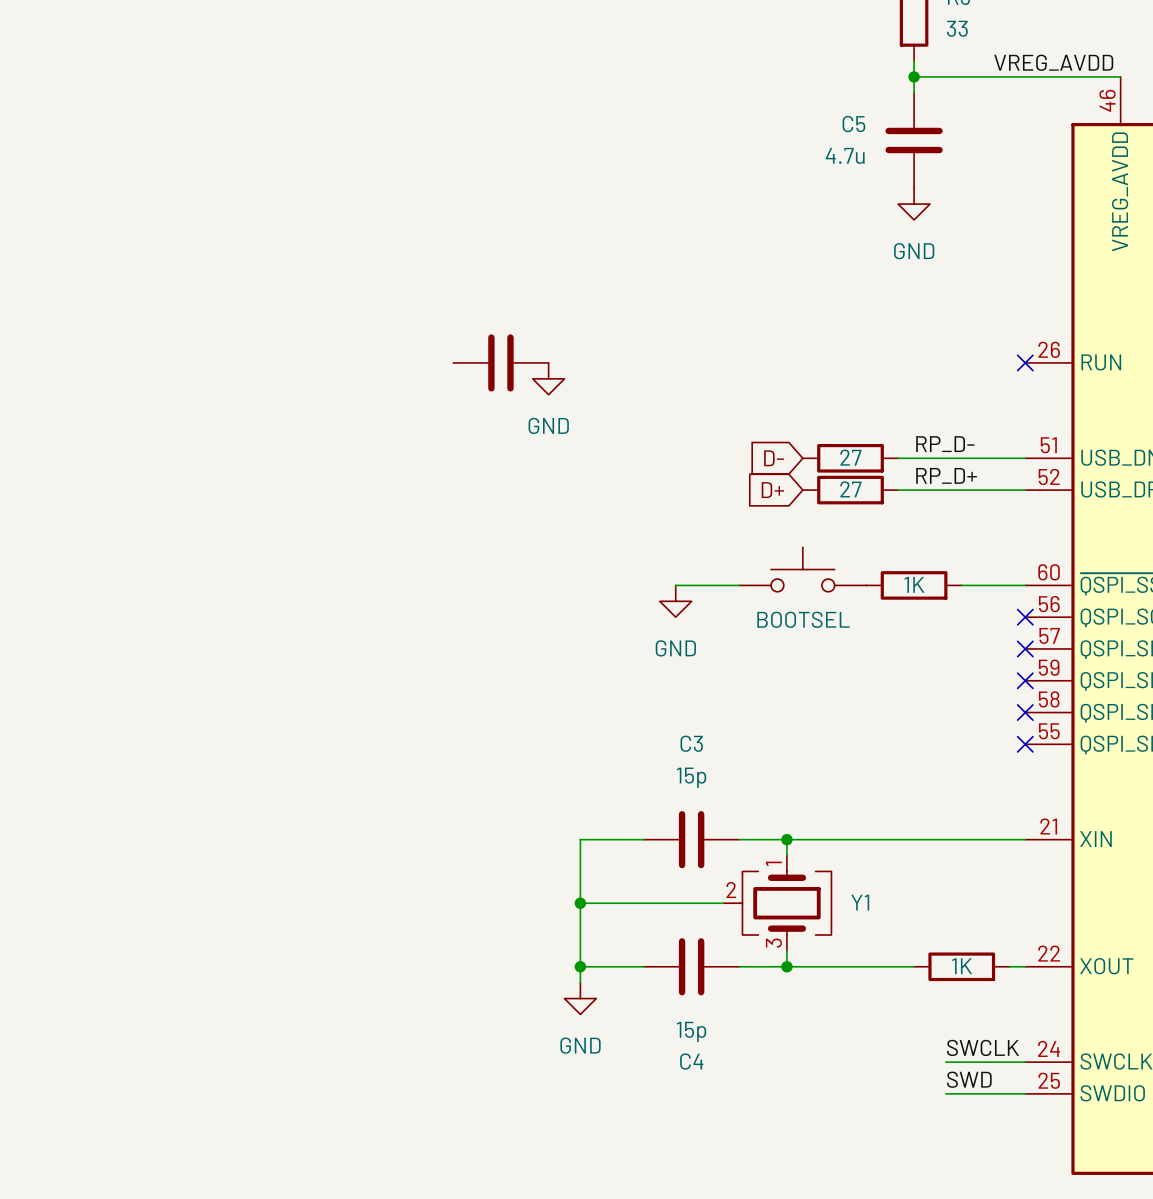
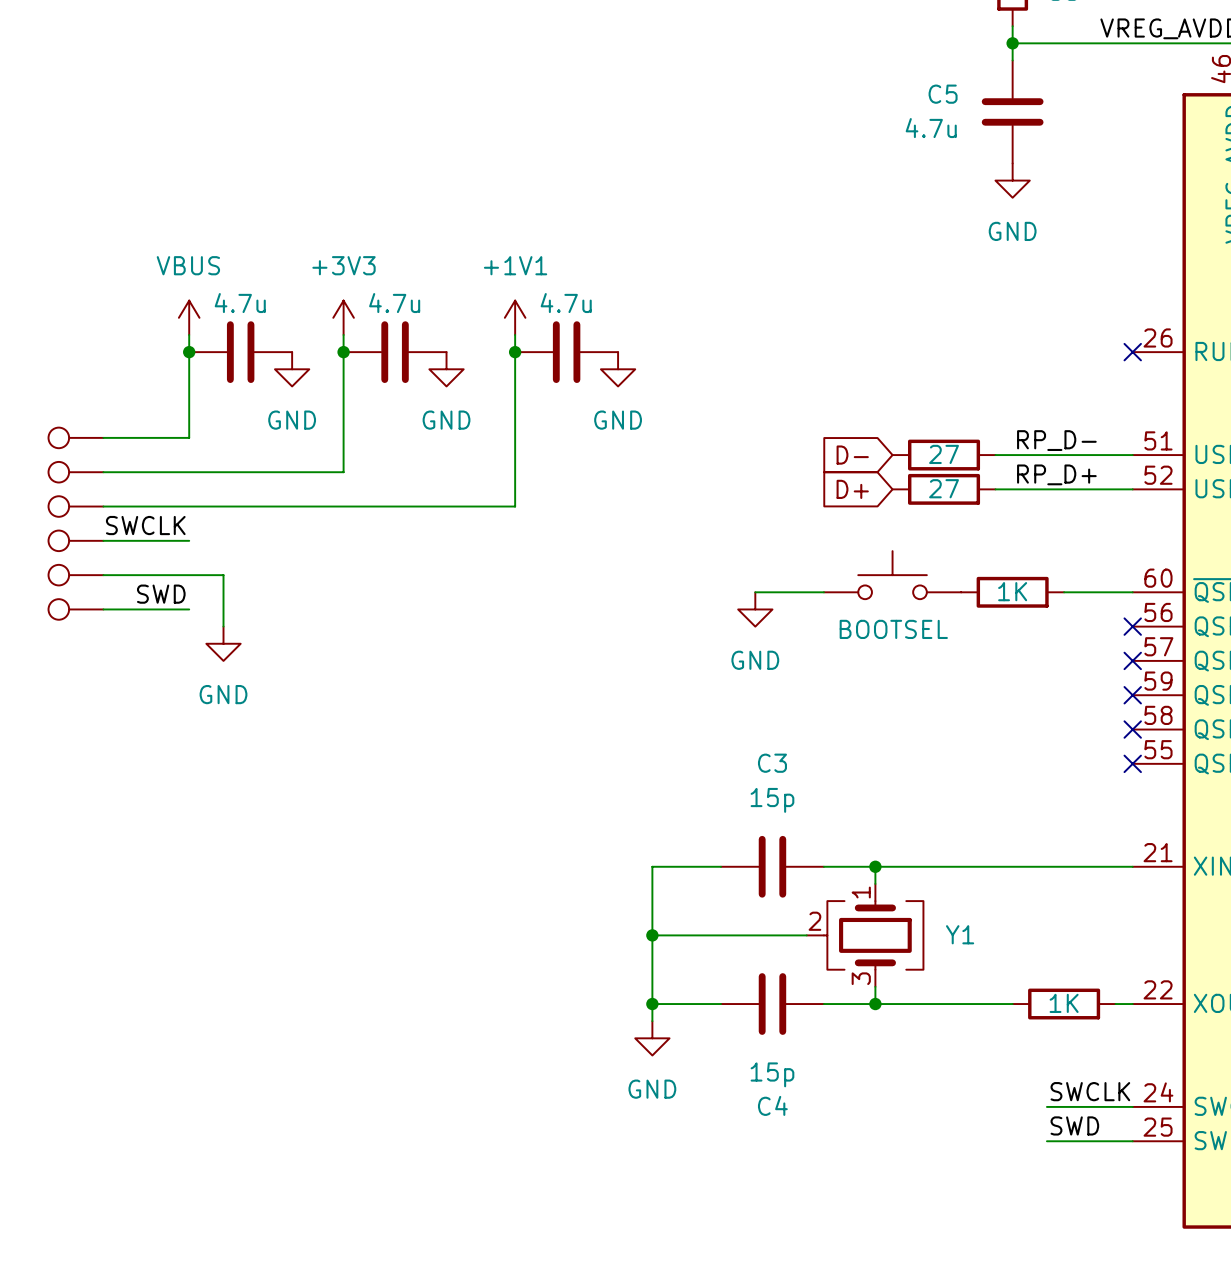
part value: none -> 4.7u (566, 303)
power symbol: none -> VBUS (189, 317)
power symbol: none -> +3V3 (343, 317)
power symbol: none -> +1V1 (515, 317)
wire: none -> (189, 334) (189, 437) (103, 437)
wire: none -> (343, 334) (343, 472) (103, 472)
wire: none -> (515, 334) (515, 506) (103, 506)
junction: none -> (189, 352)
part: none -> 4.7u (240, 352)
junction: none -> (343, 352)
part: none -> 4.7u (395, 352)
junction: none -> (515, 352)
power symbol: none -> GND (292, 369)
power symbol: none -> GND (446, 369)
part: none -> (75, 437)
part: none -> (75, 472)
part: none -> (75, 506)
label: none -> SWCLK (145, 525)
part: none -> (75, 540)
wire: none -> (103, 540) (189, 540)
part: none -> (75, 575)
wire: none -> (103, 575) (223, 575) (223, 626)
label: none -> SWD (161, 594)
part: none -> (75, 609)
wire: none -> (103, 609) (189, 609)
power symbol: none -> GND (223, 643)

